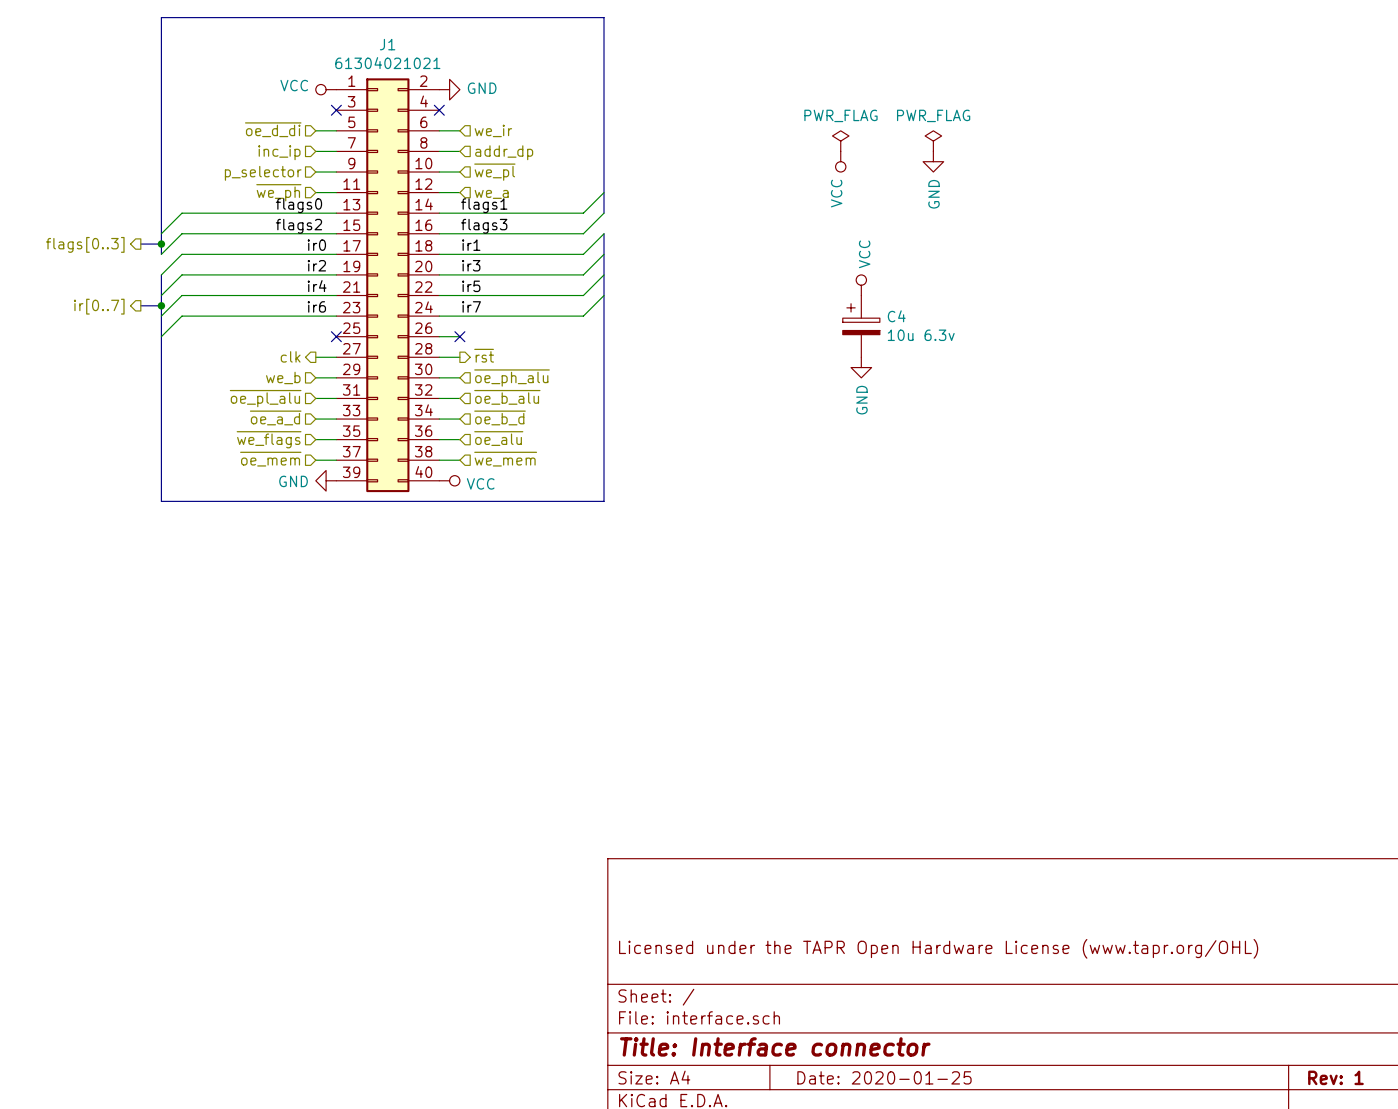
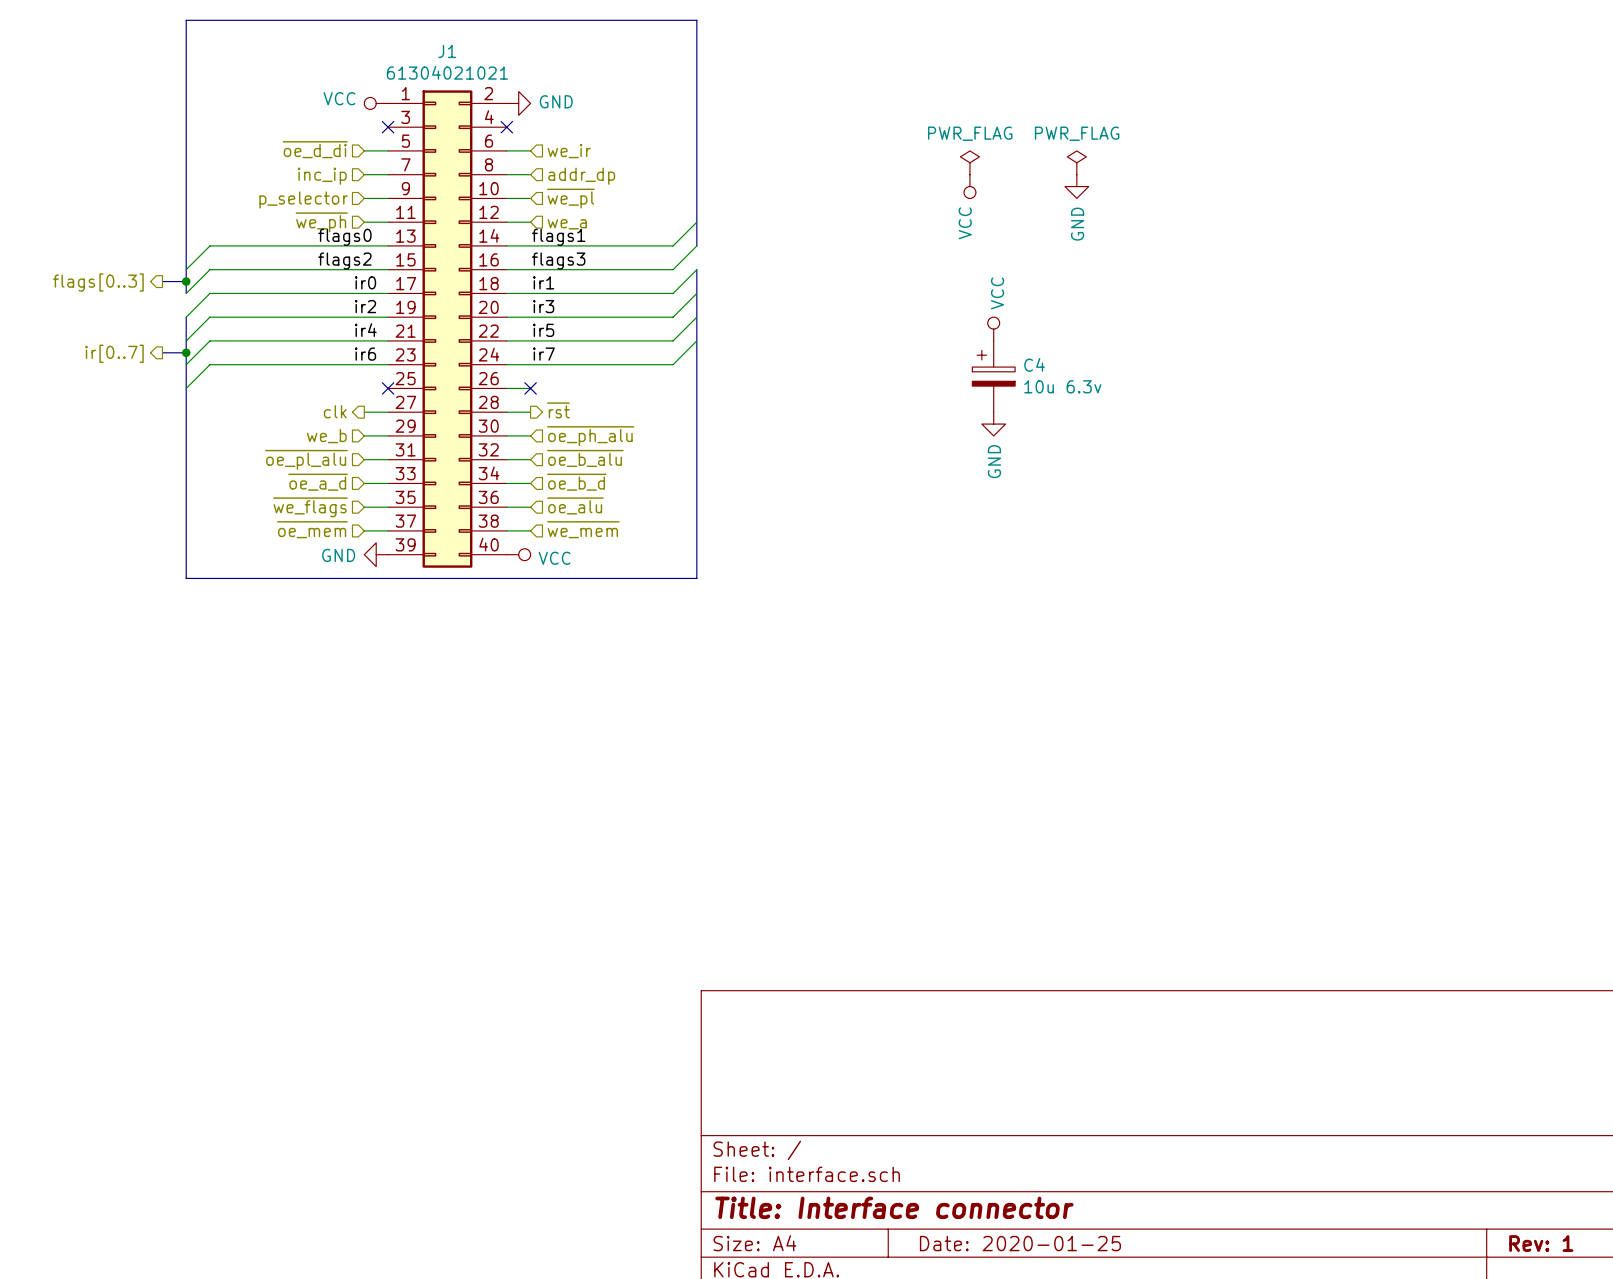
title block: Licensed under the TAPR Open Hardware License (www.tapr.org/OHL) (938, 948) -> none

